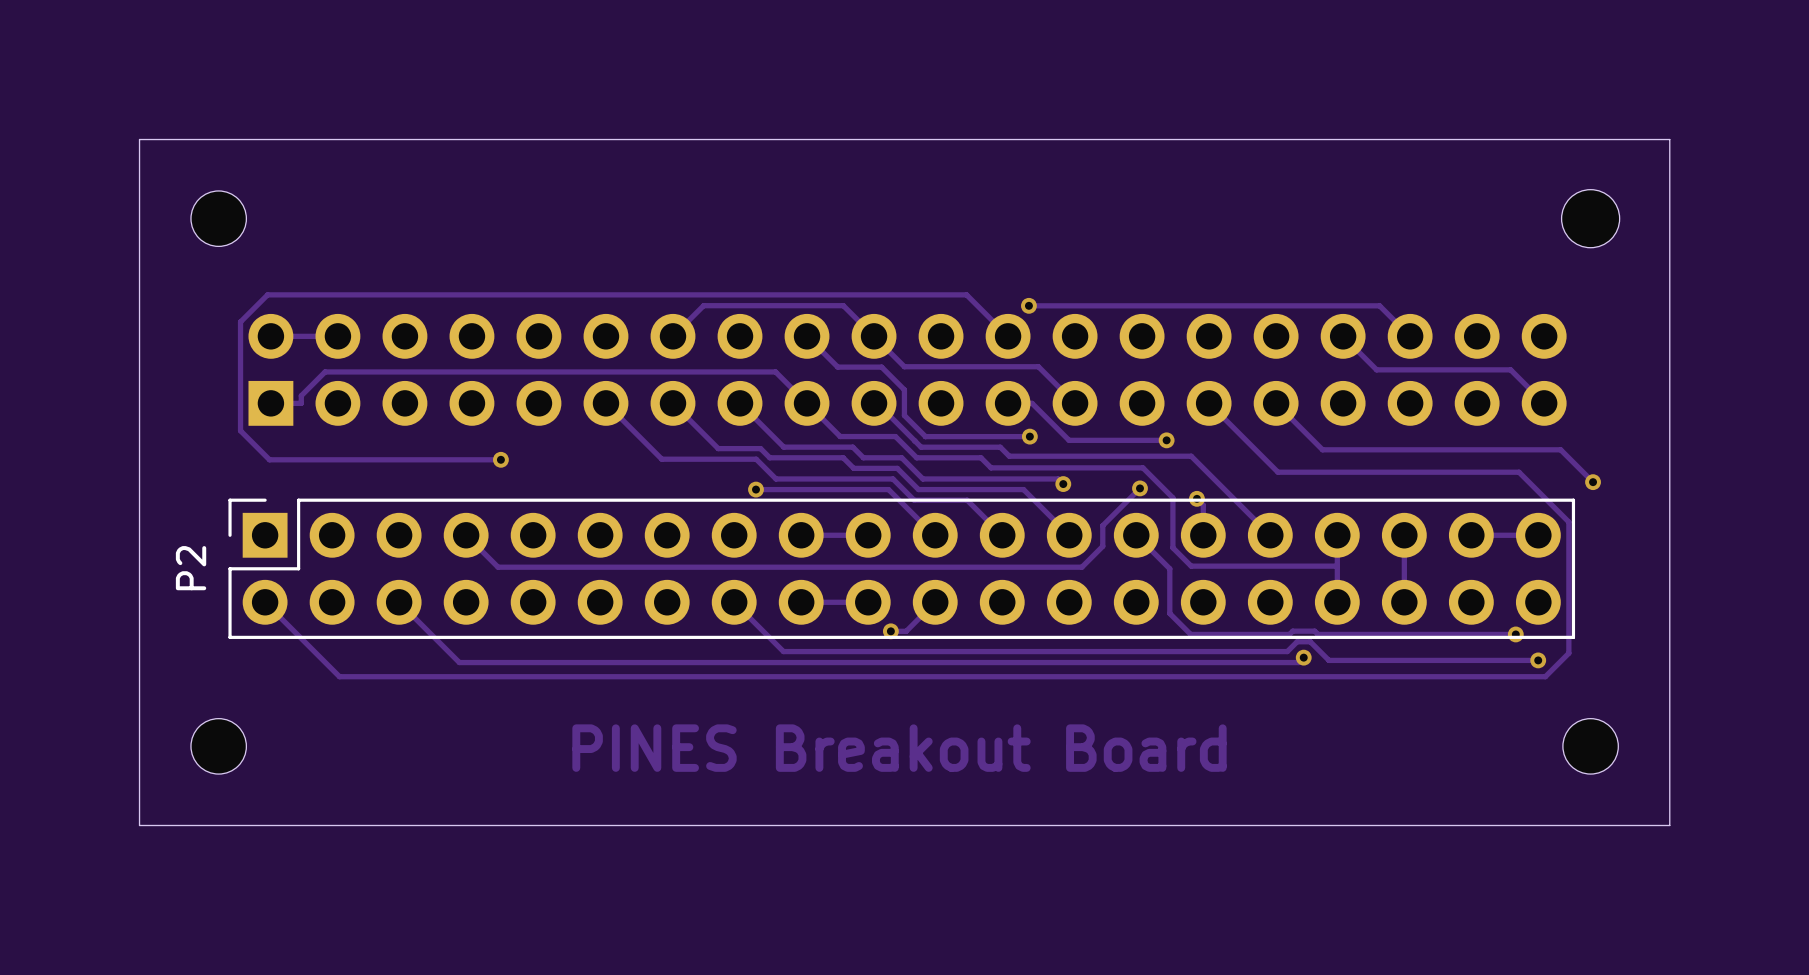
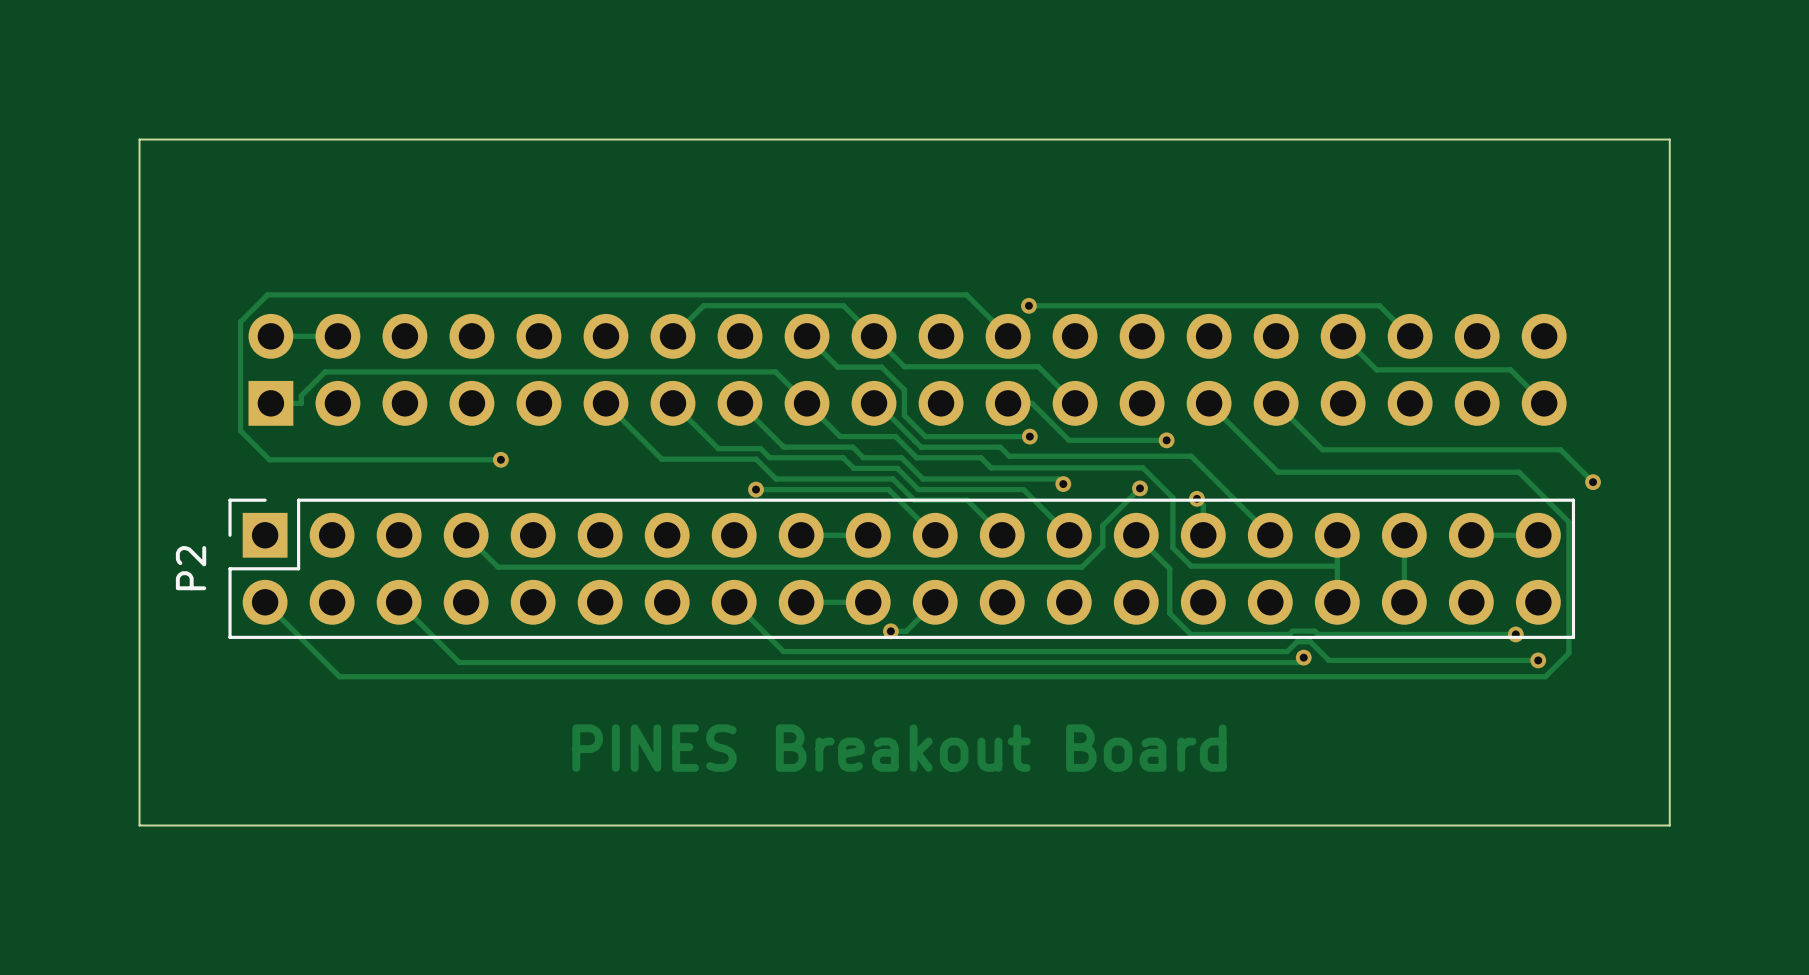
part: (218, 218) -> none
part: (1590, 218) -> none
part: (218, 746) -> none
part: (1590, 746) -> none

